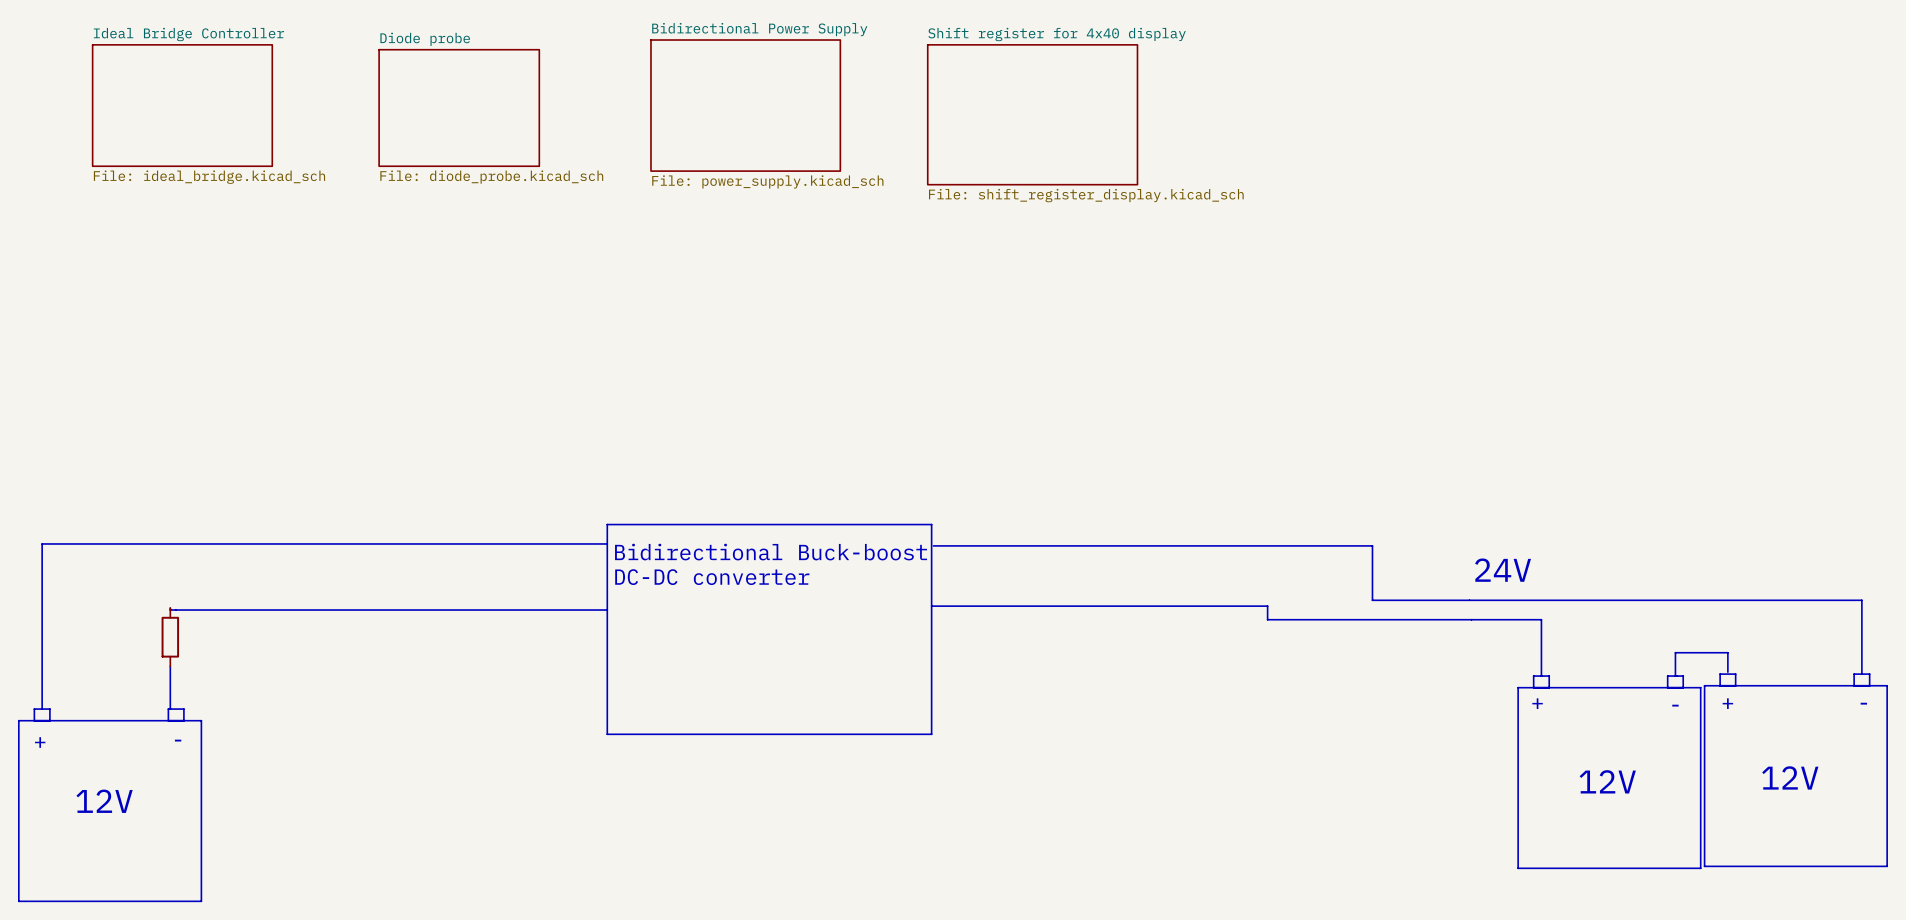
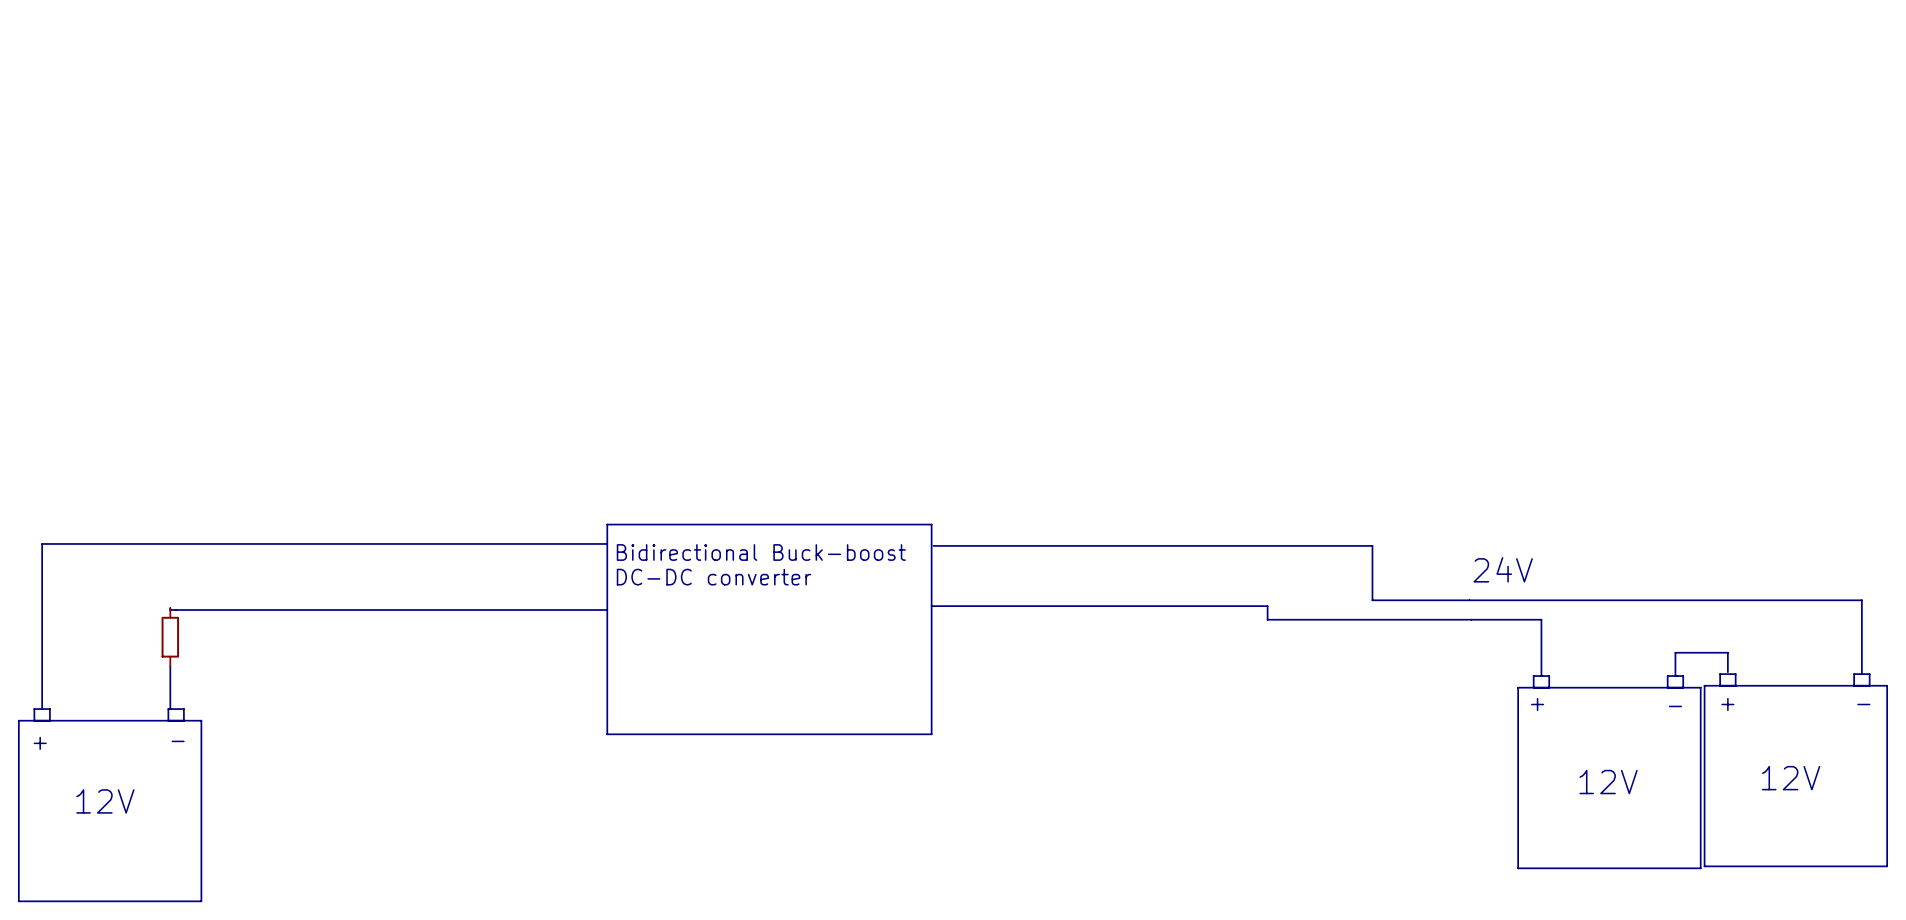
sheet Ideal Bridge Controller: File: ideal_bridge.kicad_sch (182, 105) -> none
sheet Bidirectional Power Supply: File: power_supply.kicad_sch (745, 105) -> none
sheet Diode probe: File: diode_probe.kicad_sch (459, 107) -> none
sheet Shift register for 4x40 display: File: shift_register_display.kicad_sch (1032, 114) -> none

